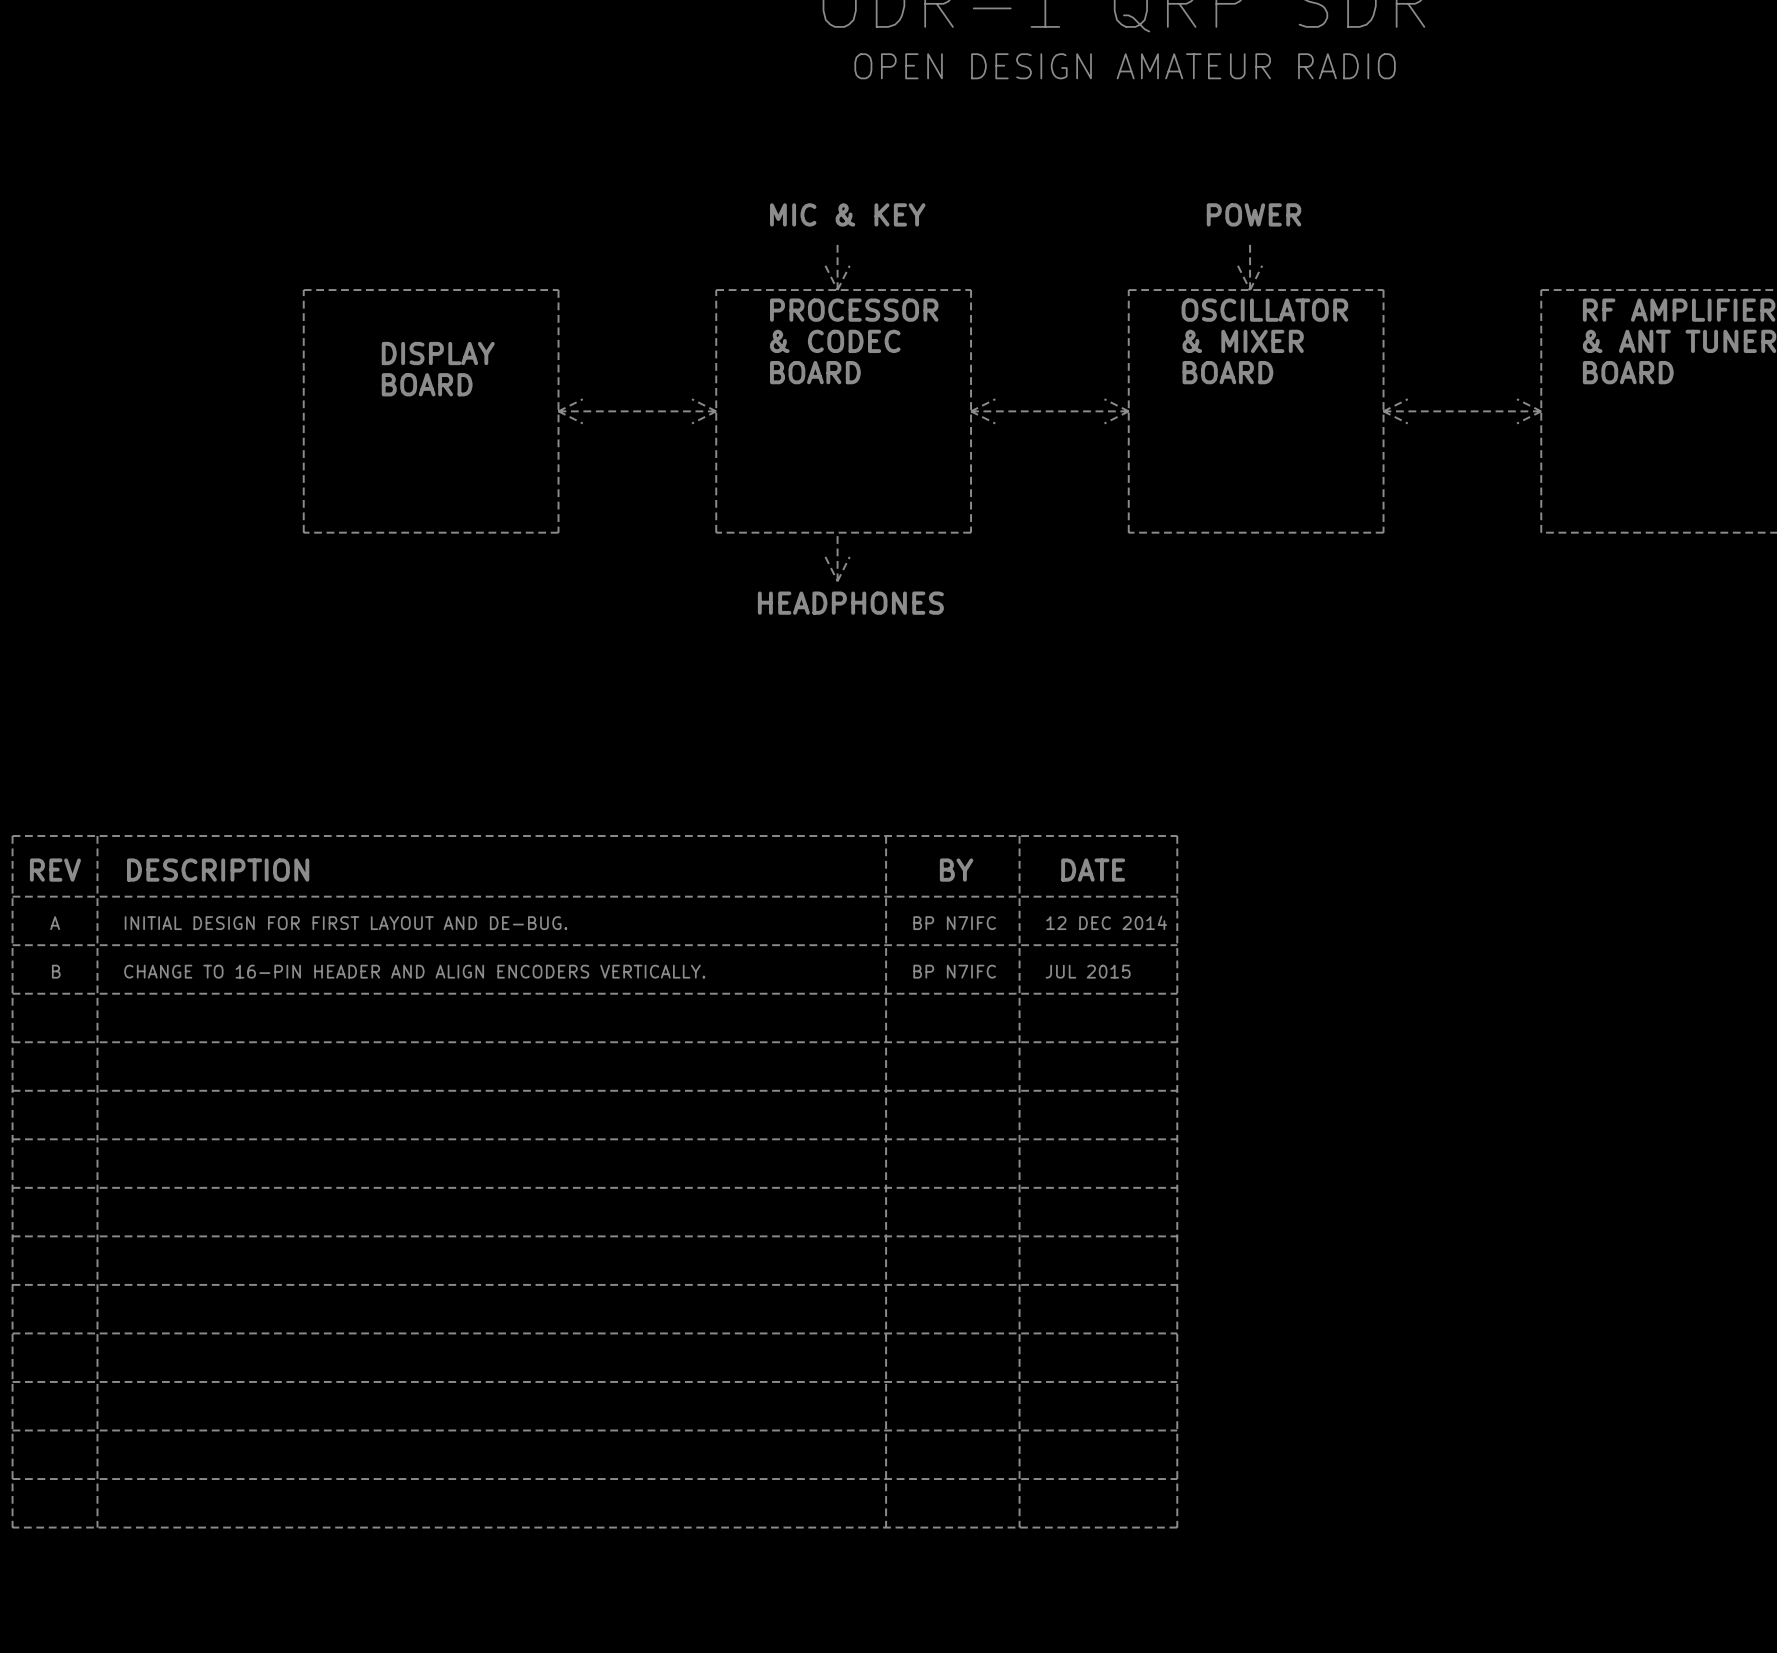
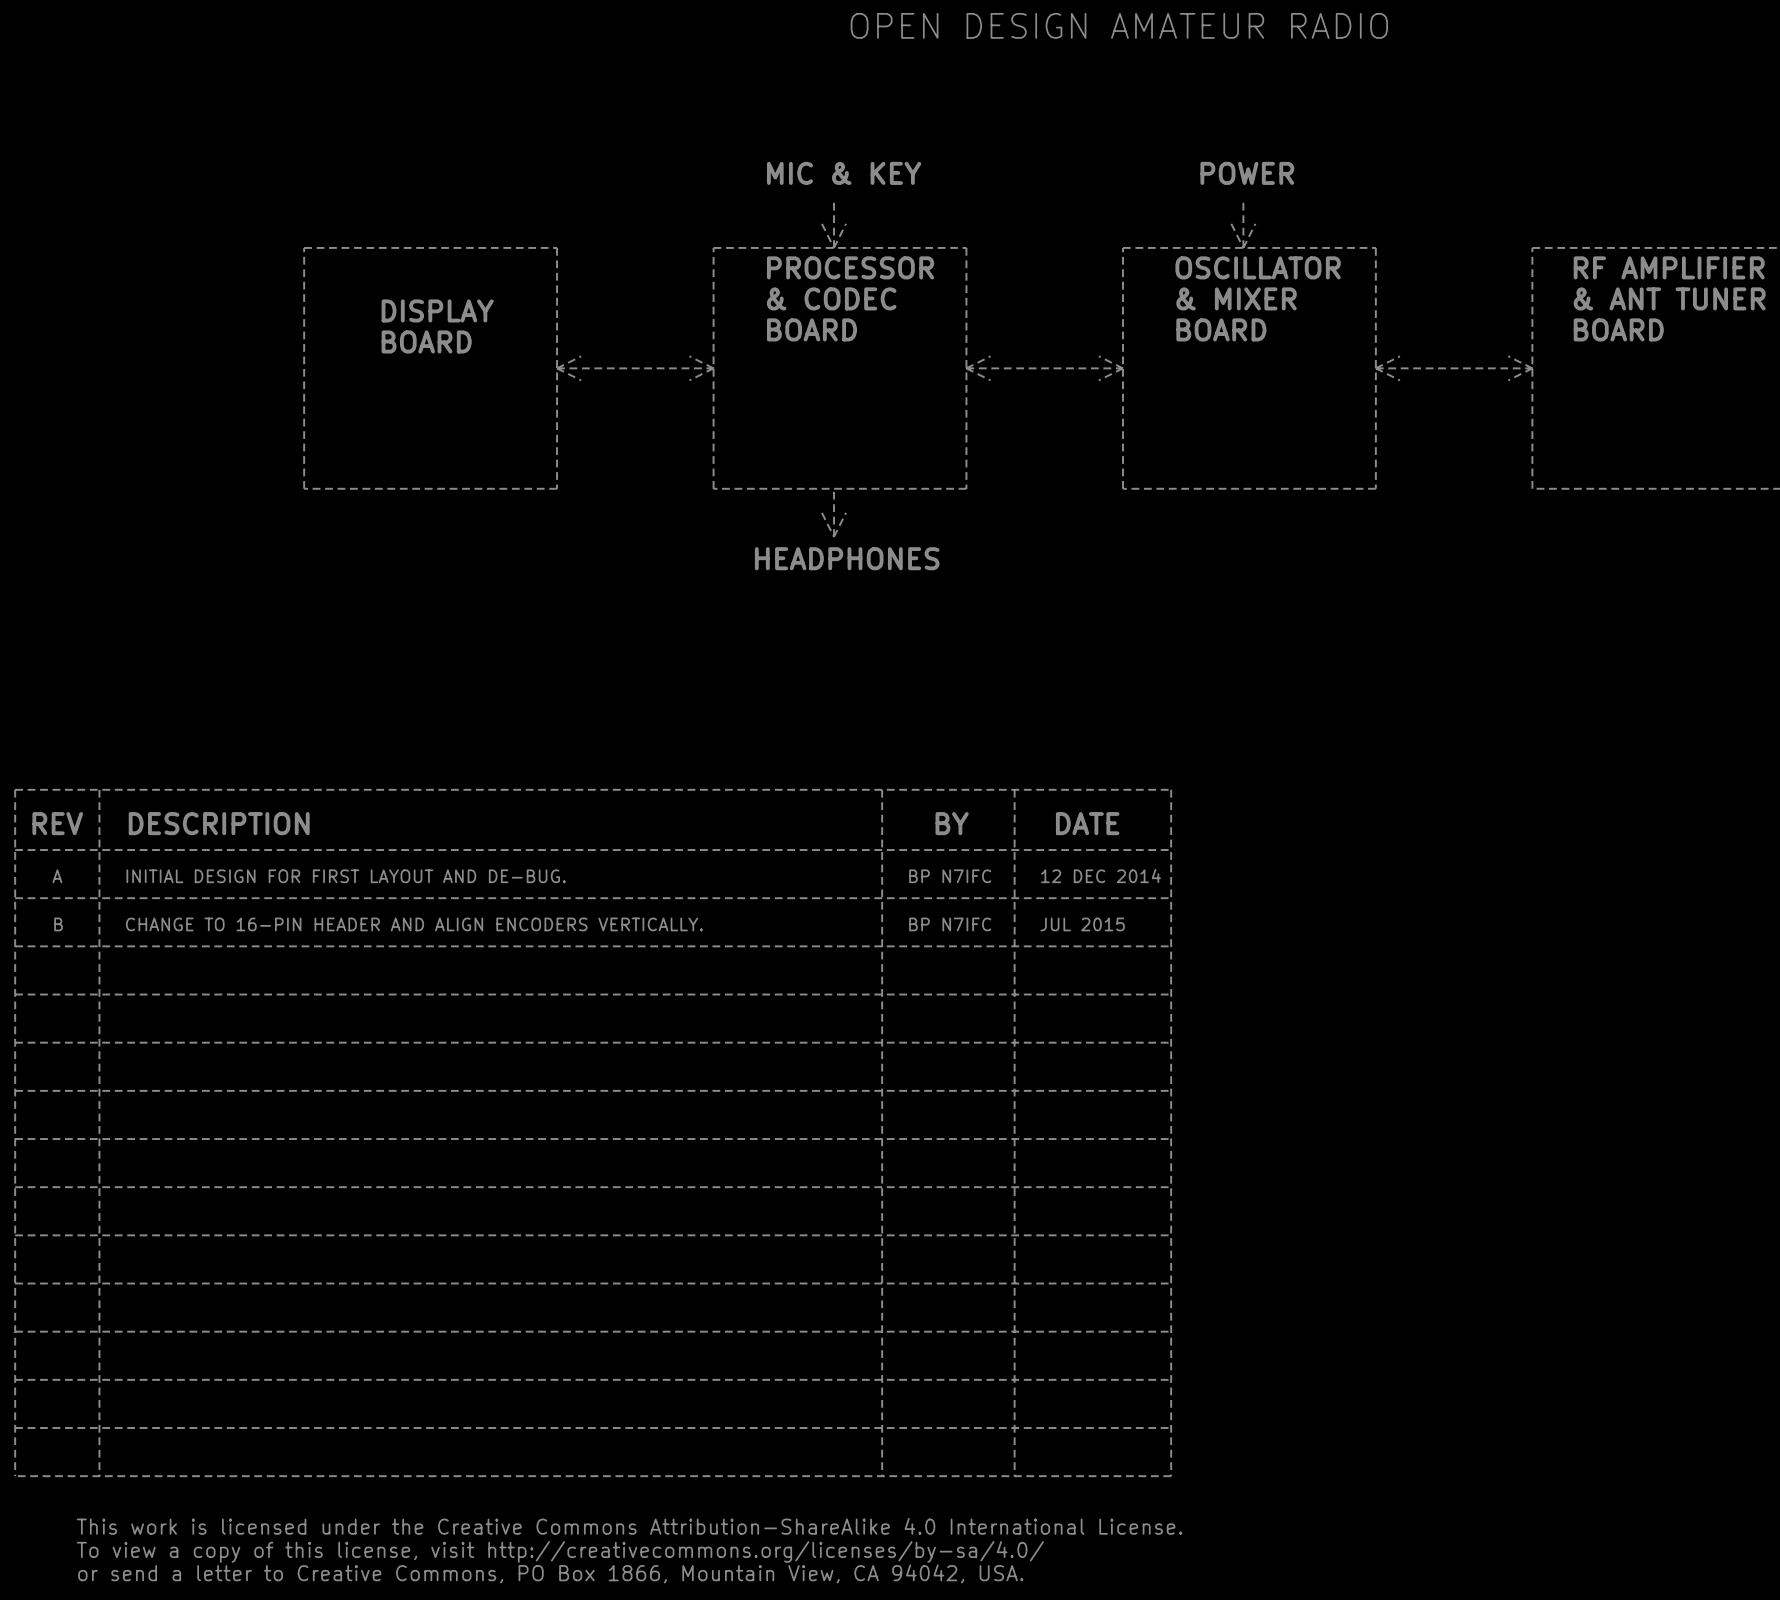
text: none -> This work is licensed under the Creative Commons Attribution-ShareAlike 4.0 International License. (629, 1526)
text: none -> To view a copy of this license, visit http://creativecommons.org/licenses/by-sa/4.0/ (560, 1551)
text: none -> or send a letter to Creative Commons, PO Box 1866, Mountain View, CA 94042, USA. (550, 1573)

